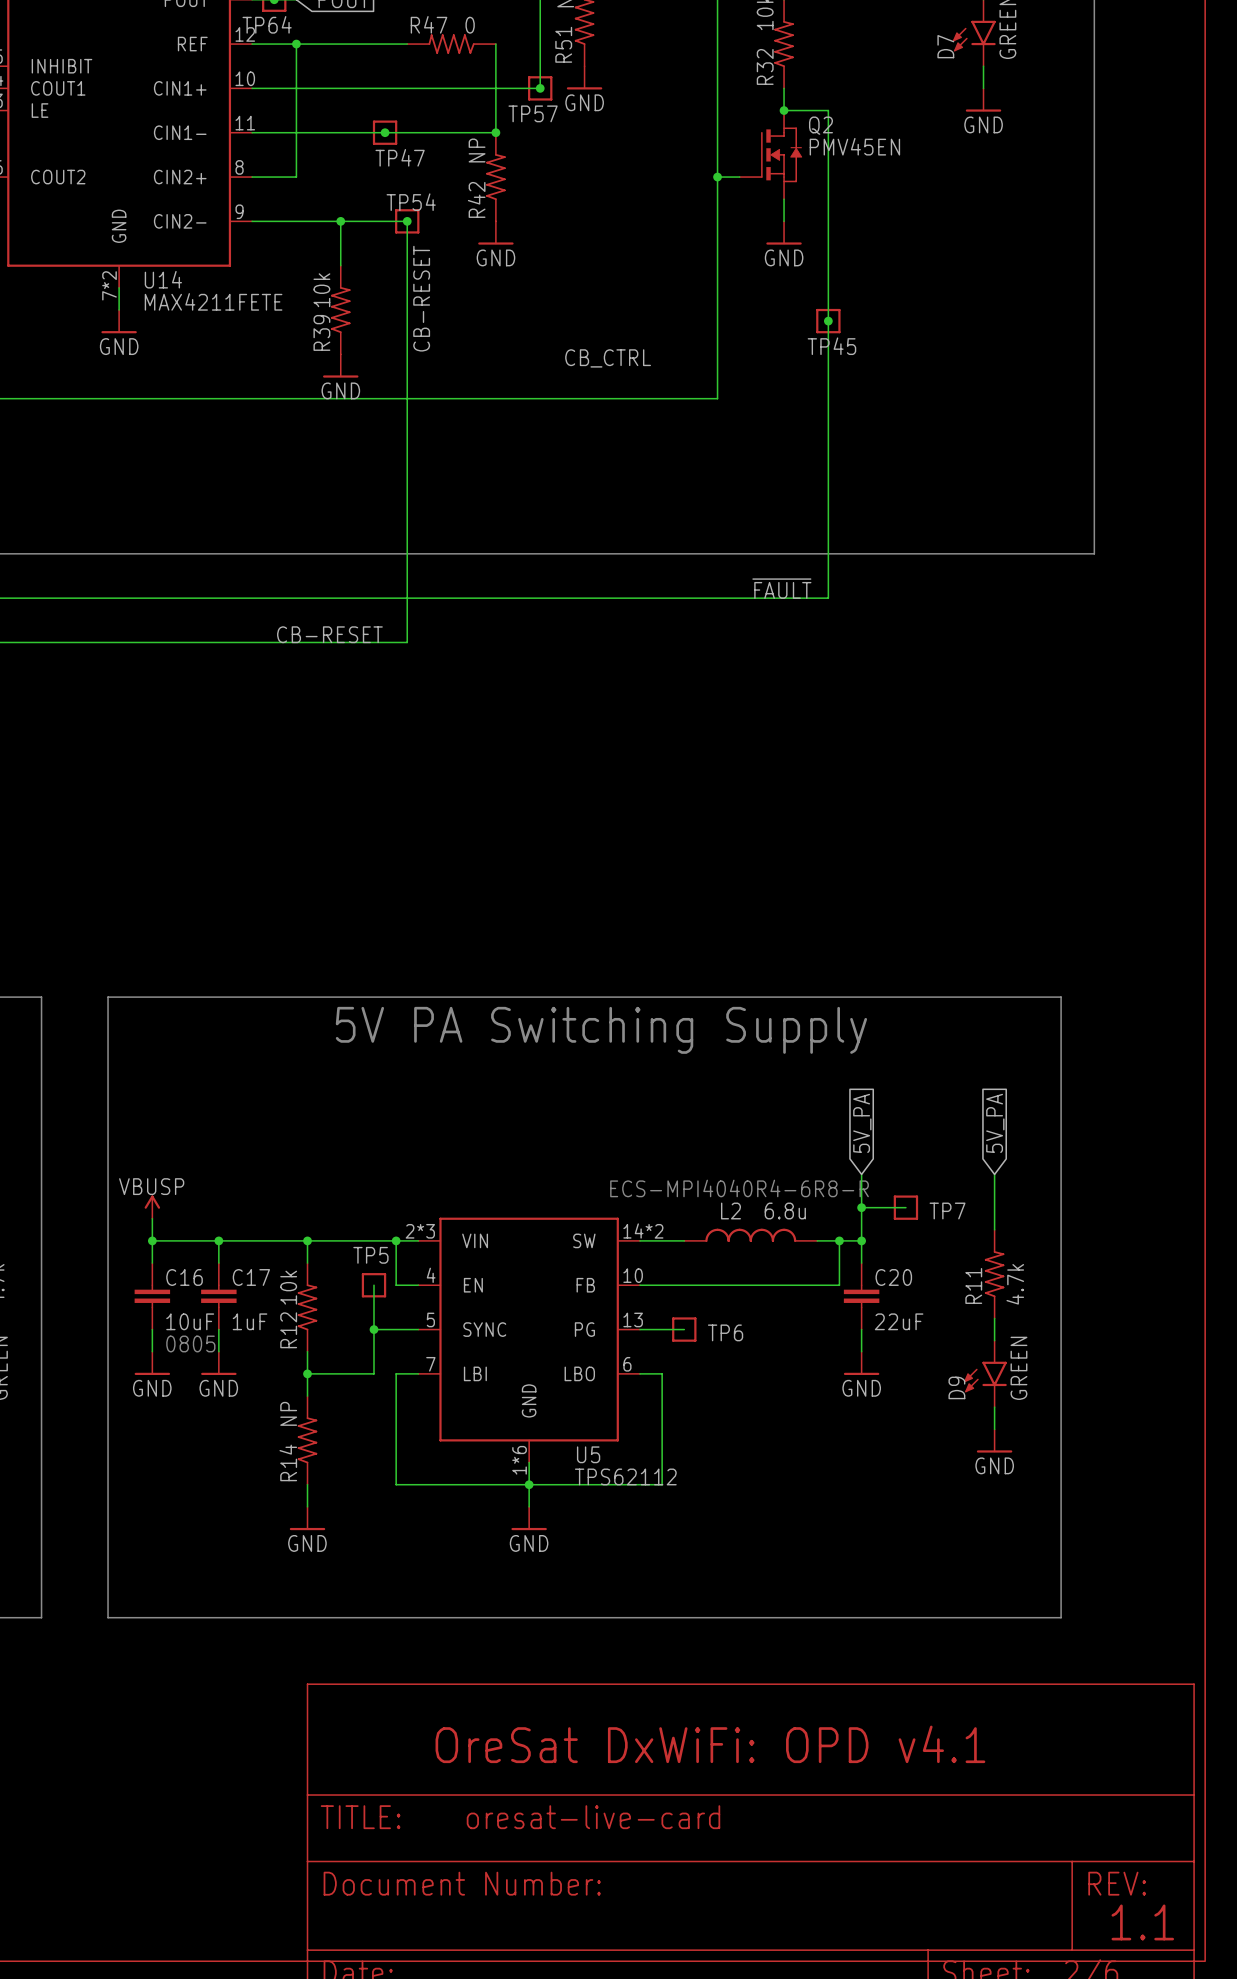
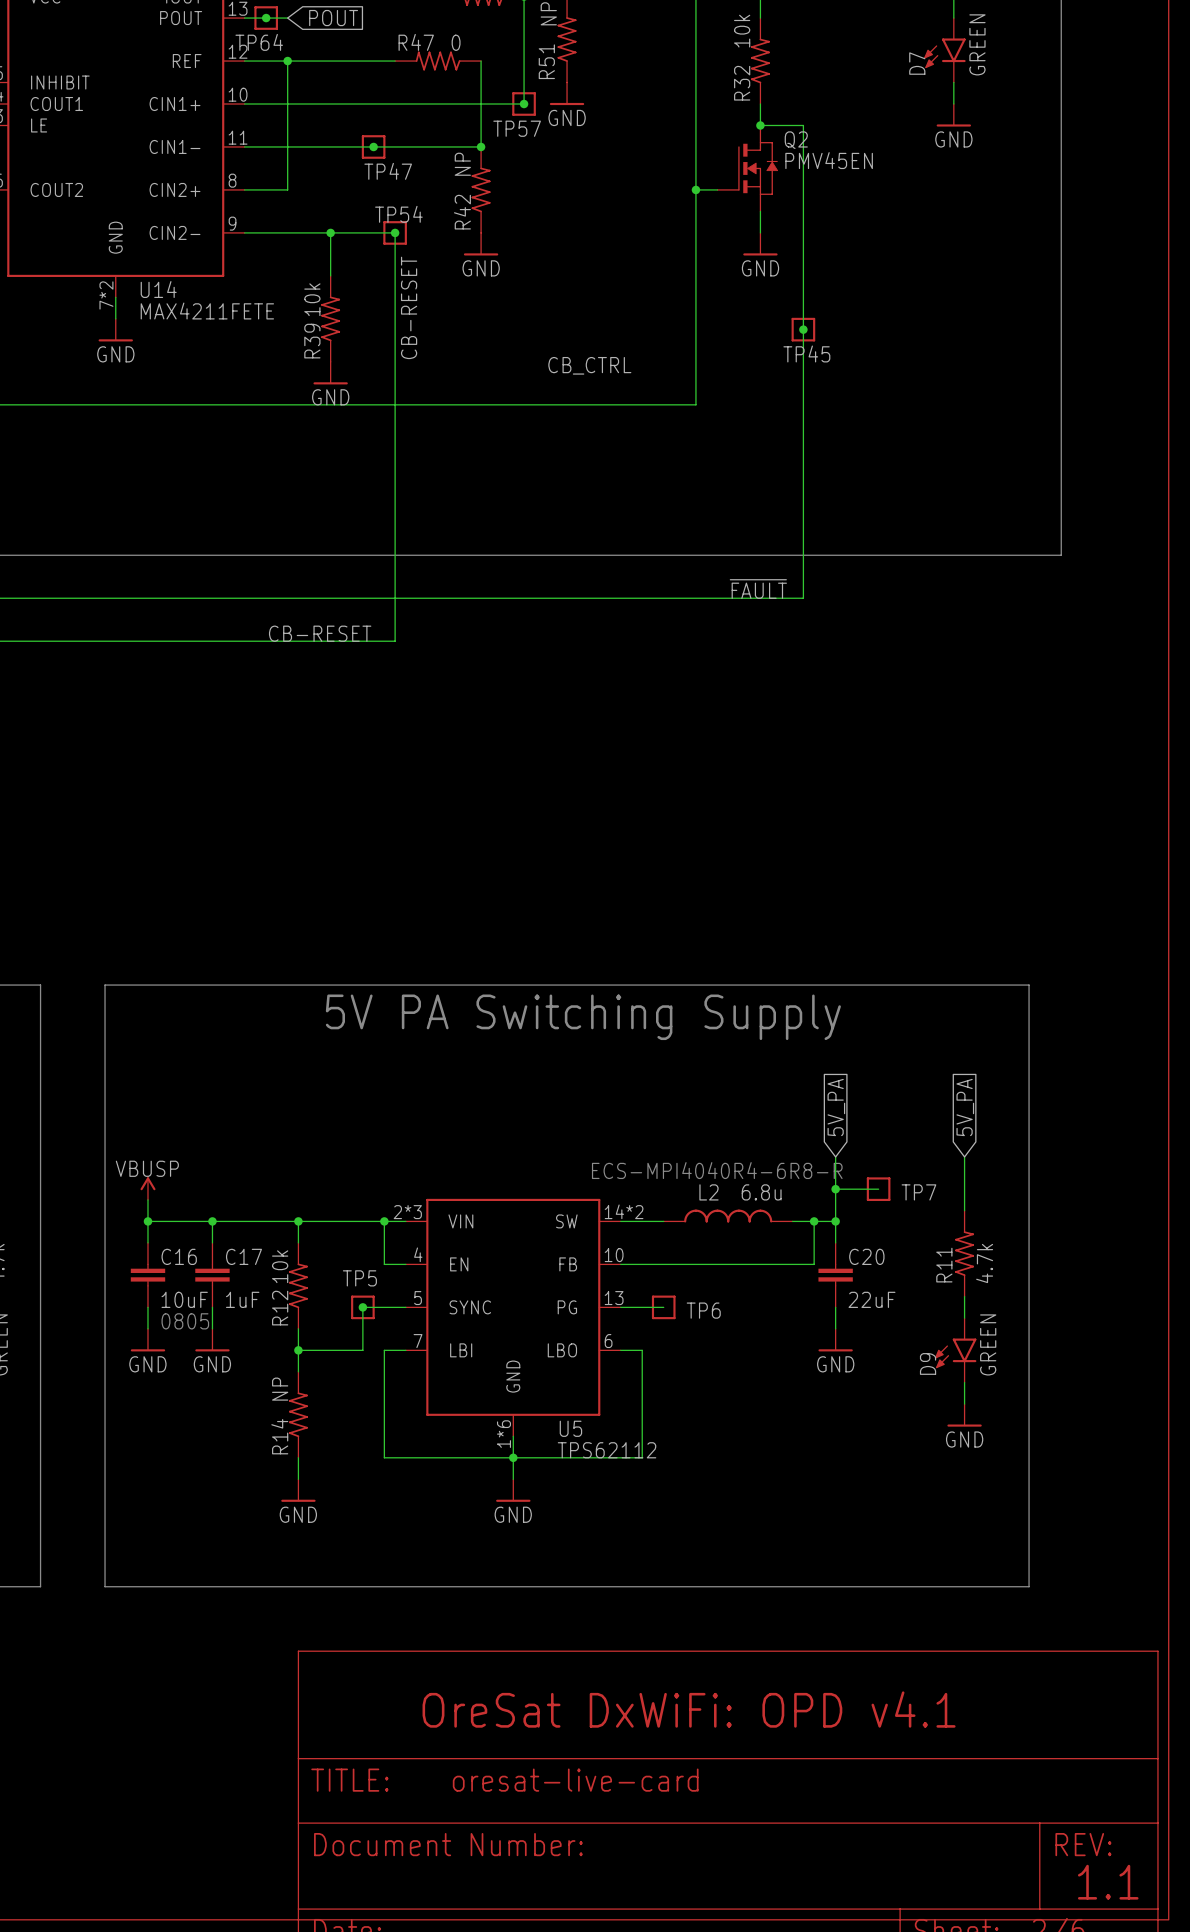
wire: (373, 1285) (373, 1329) -> none
TP5 position: (373, 1285) -> (362, 1307)

